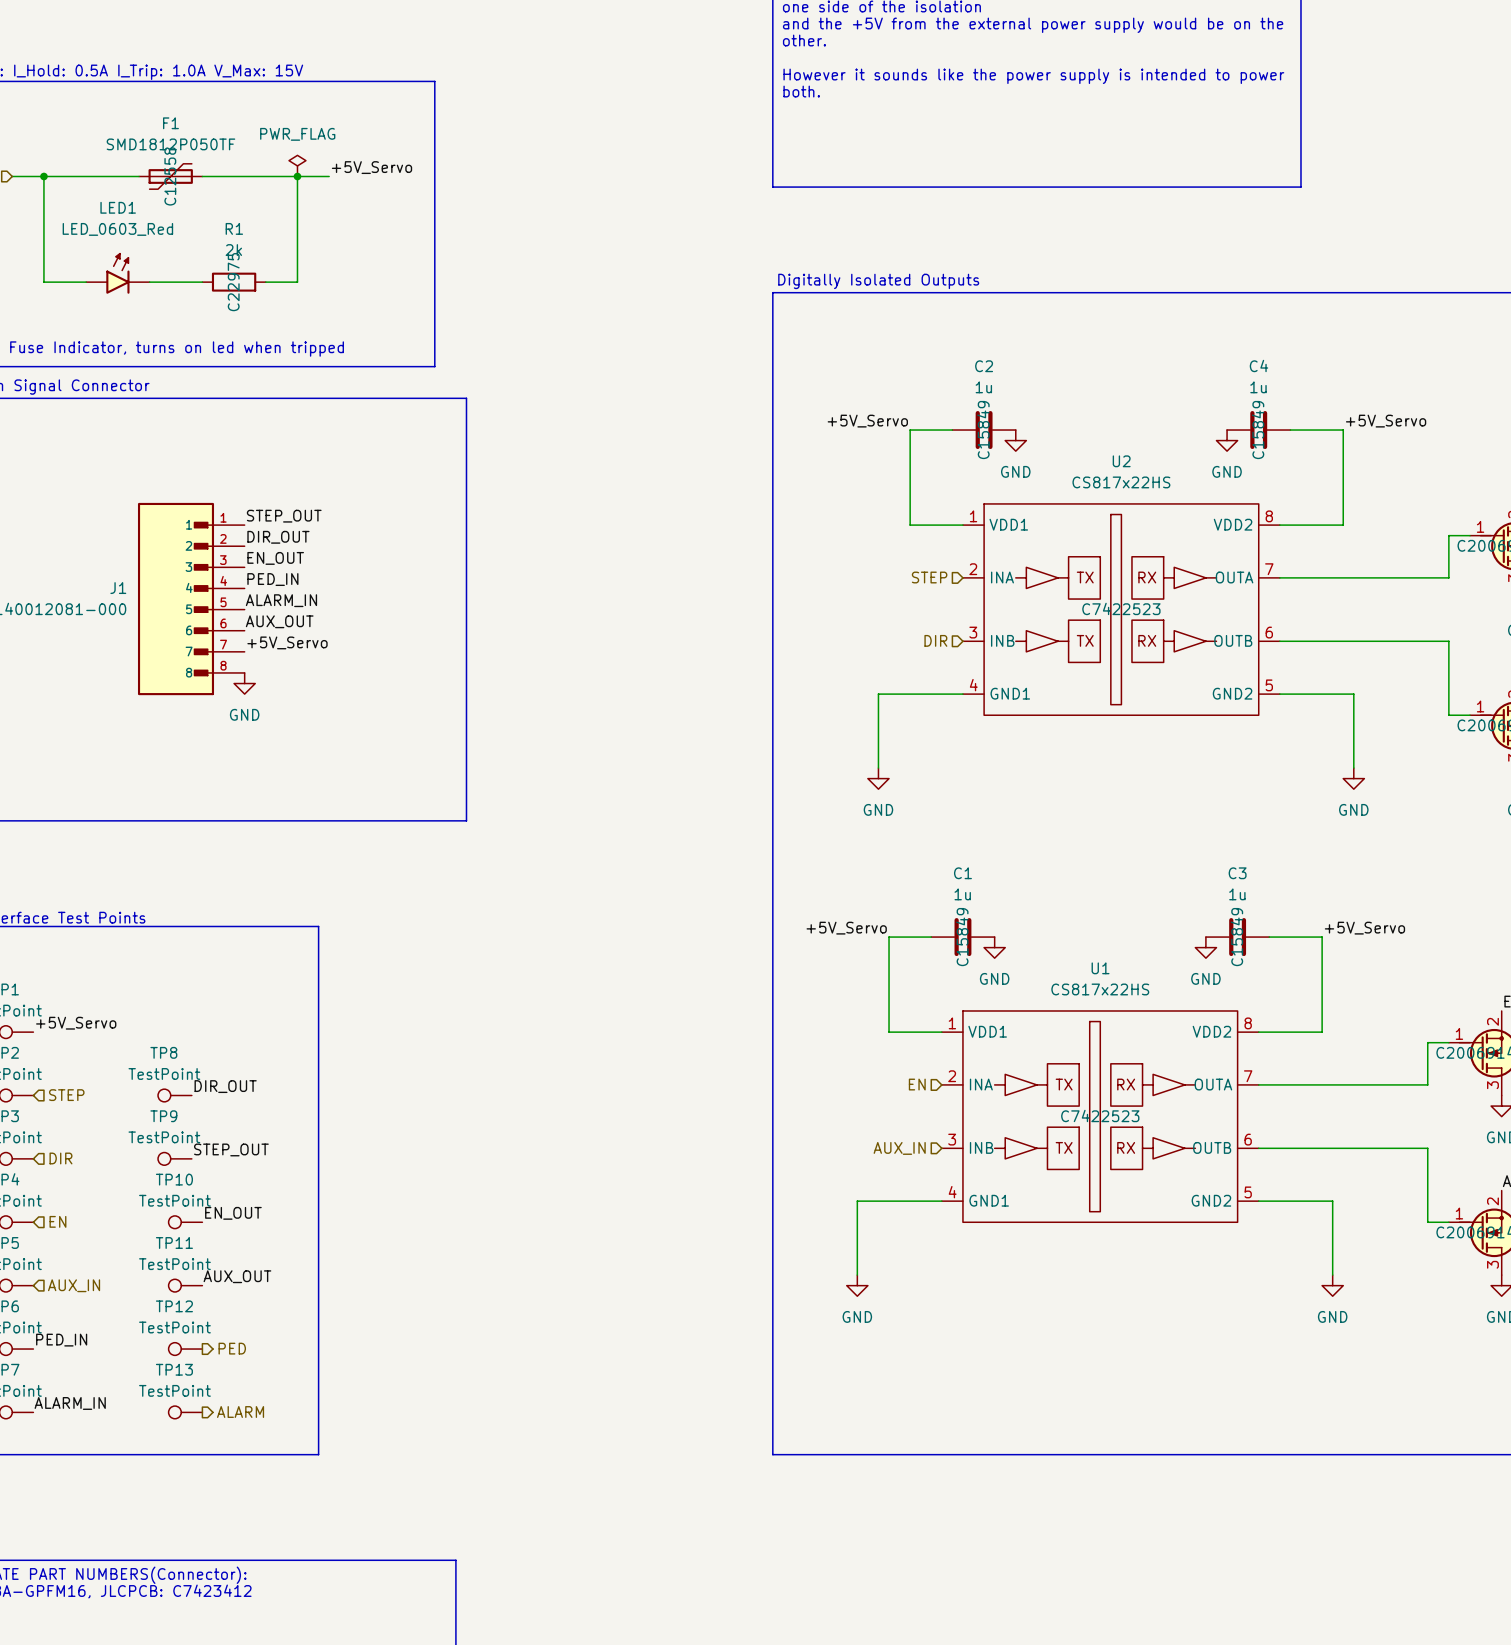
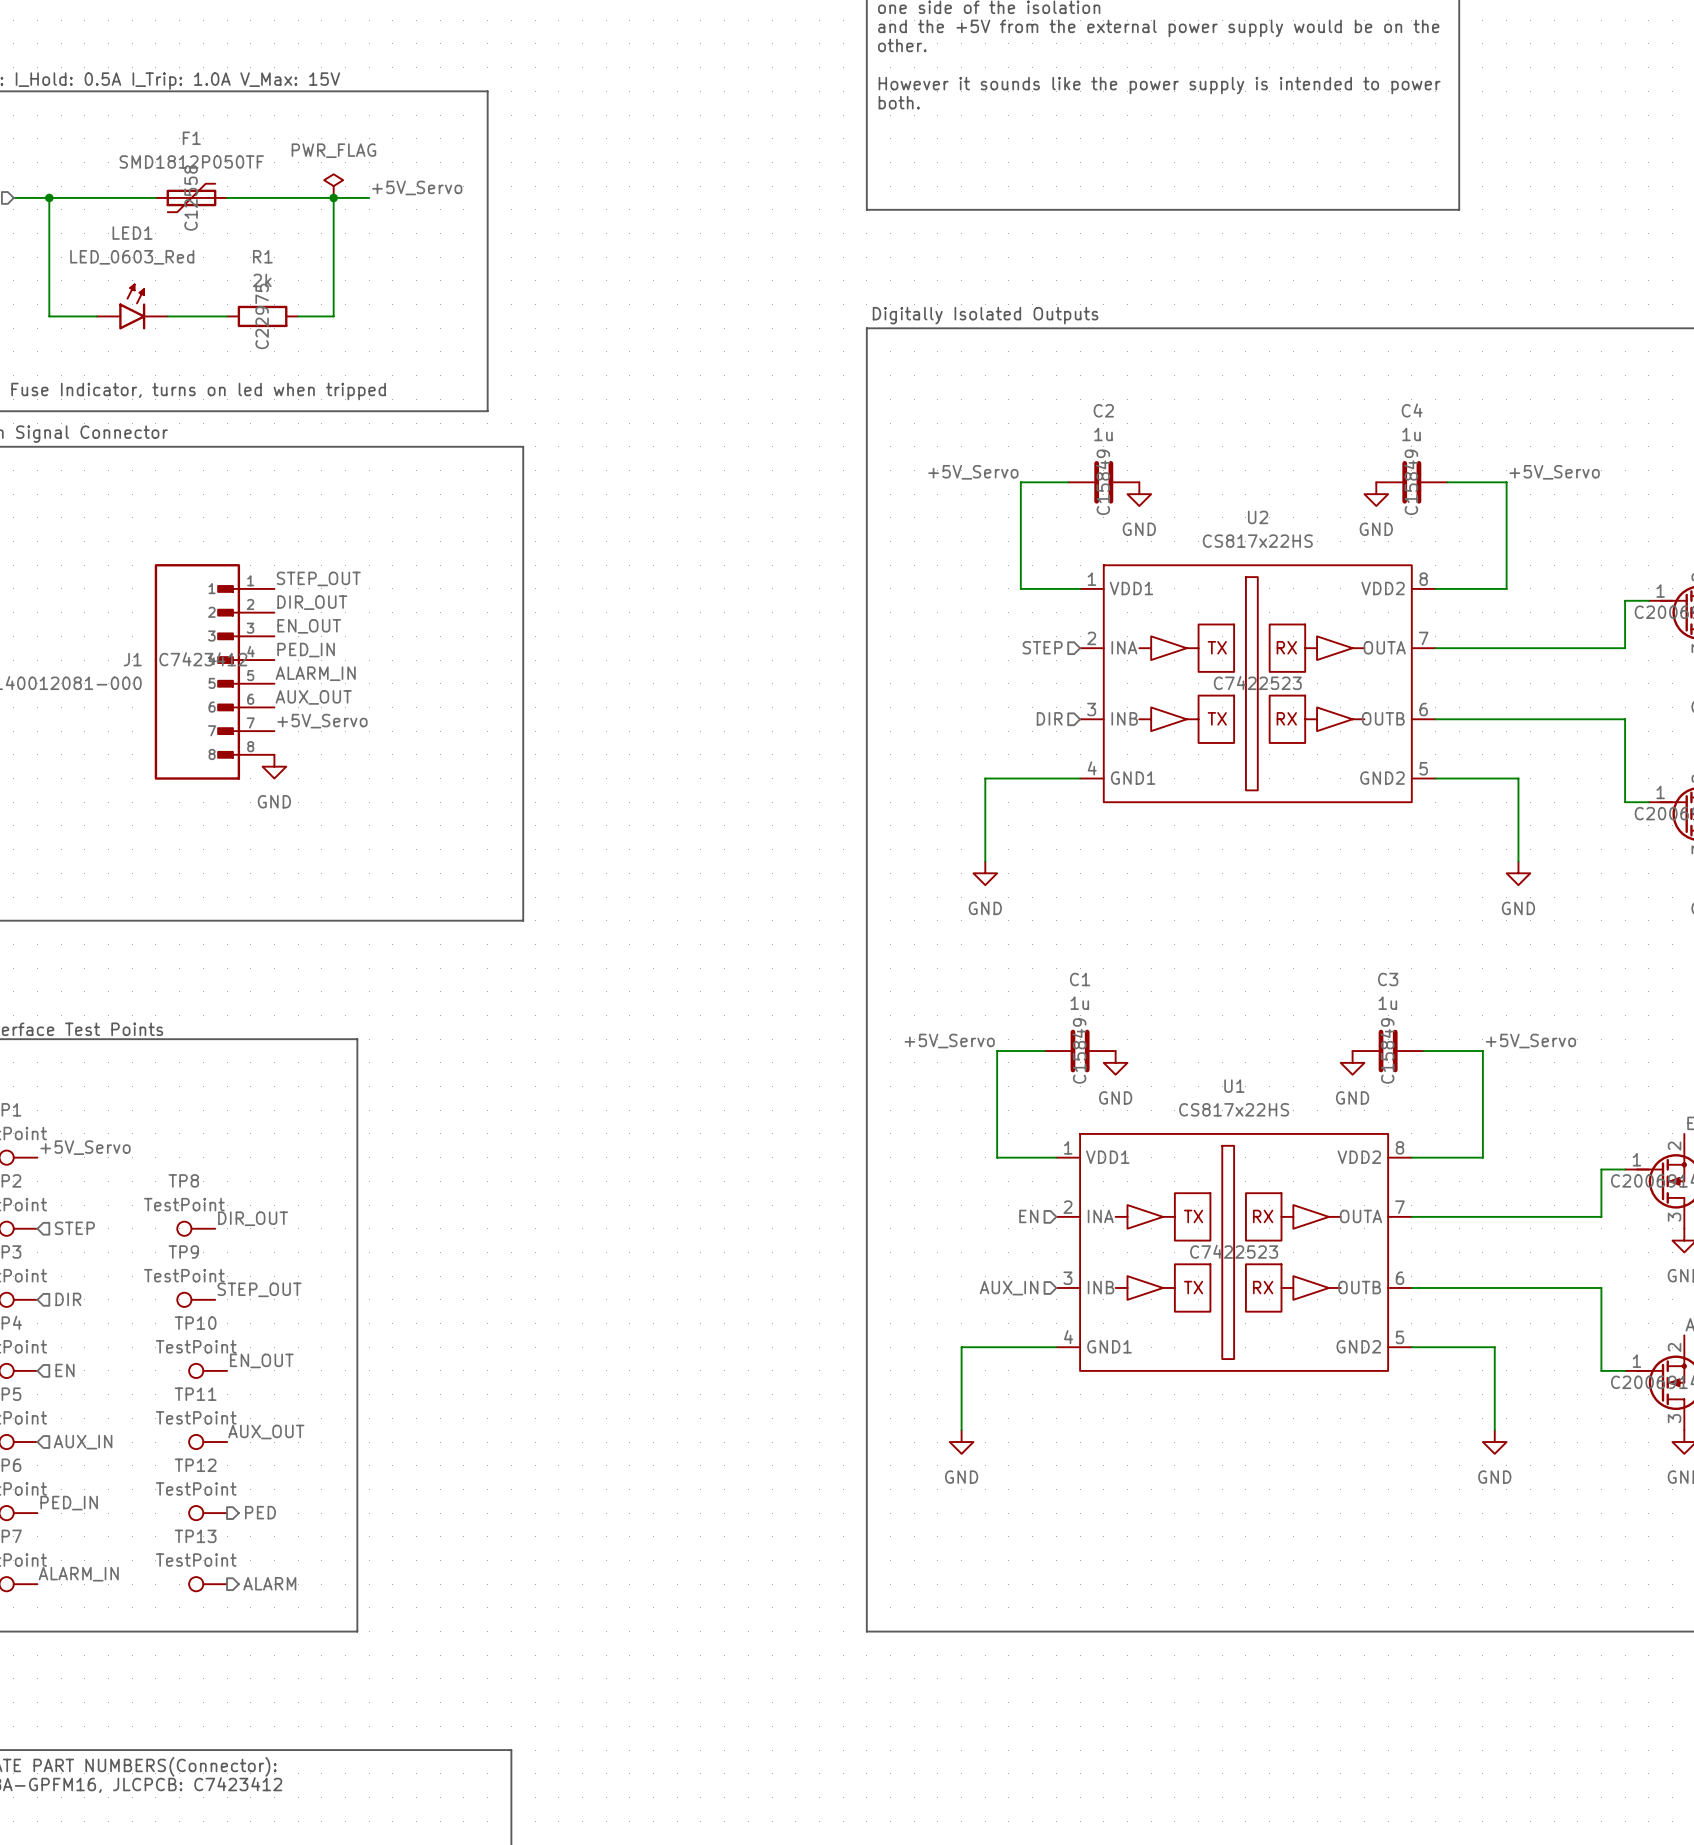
J1 text: none -> C7423412 (203, 659)

